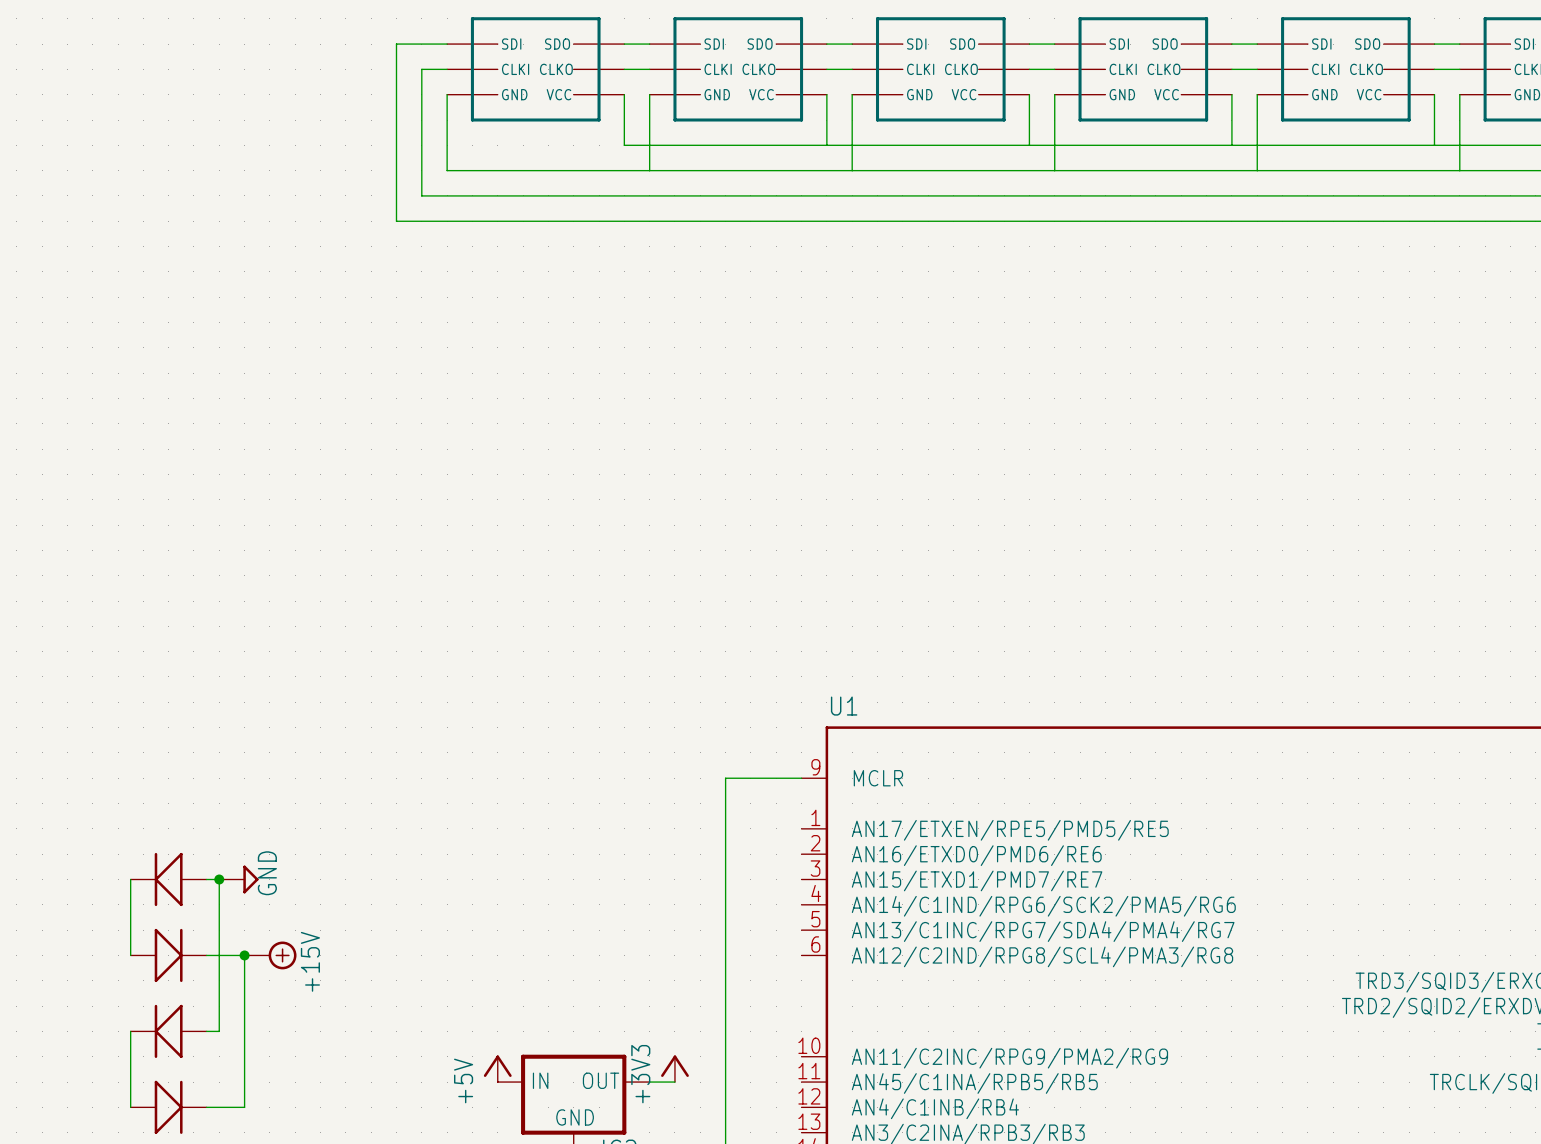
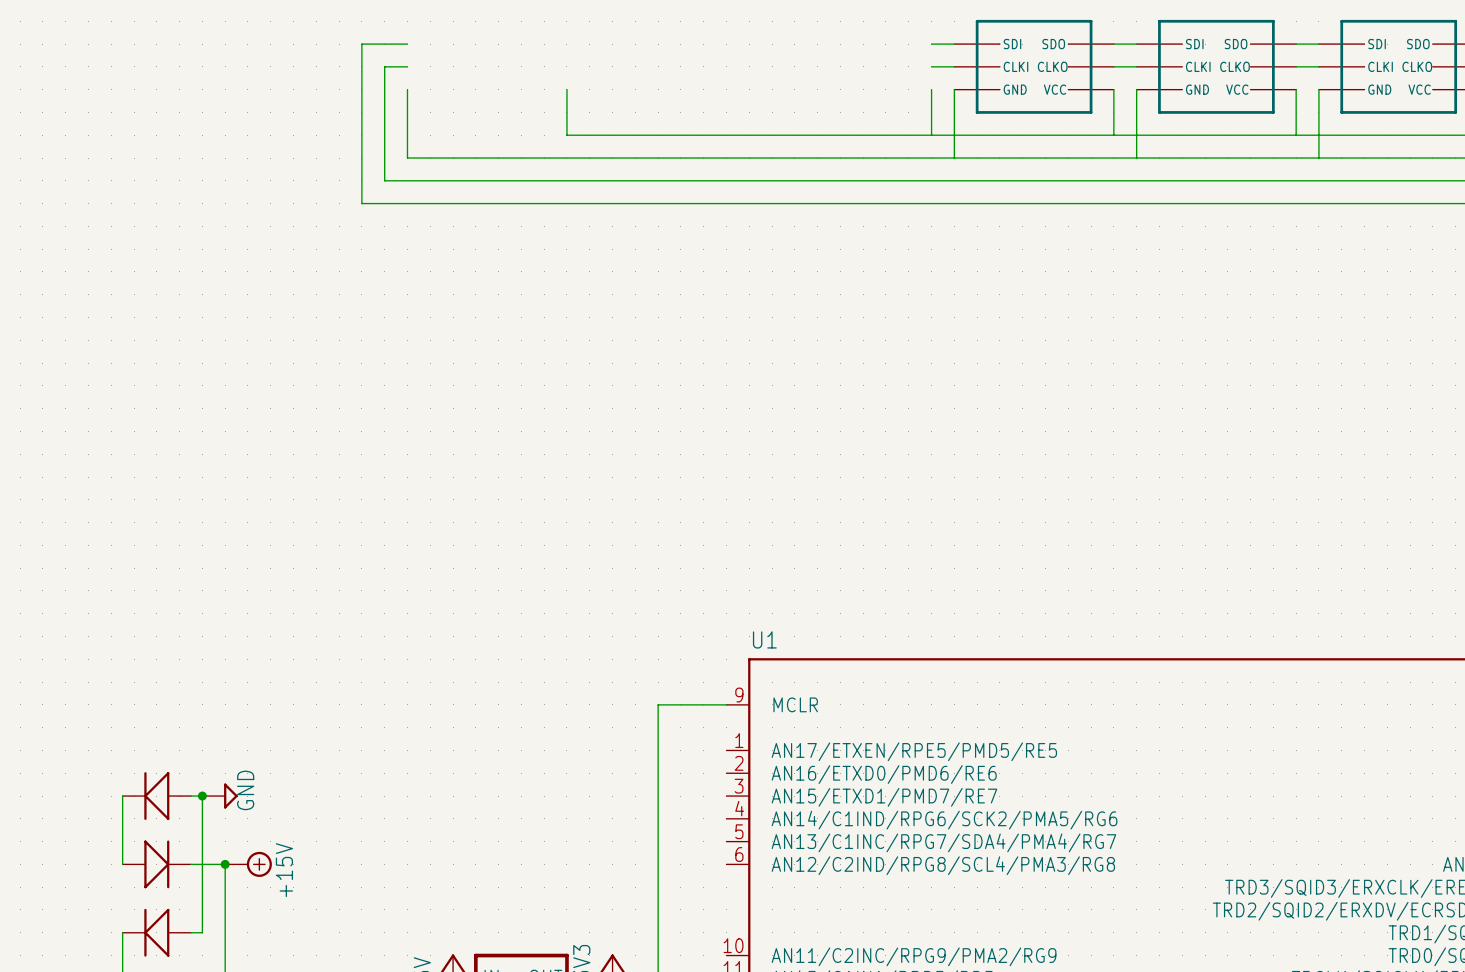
wire: (624, 44) (649, 44) -> none
wire: (826, 44) (852, 44) -> none
part: (535, 69) -> none
wire: (624, 69) (649, 69) -> none
part: (738, 69) -> none
wire: (826, 69) (852, 69) -> none
part: (940, 69) -> none
wire: (649, 94) (649, 170) -> none
wire: (826, 94) (826, 145) -> none
wire: (852, 94) (852, 170) -> none

